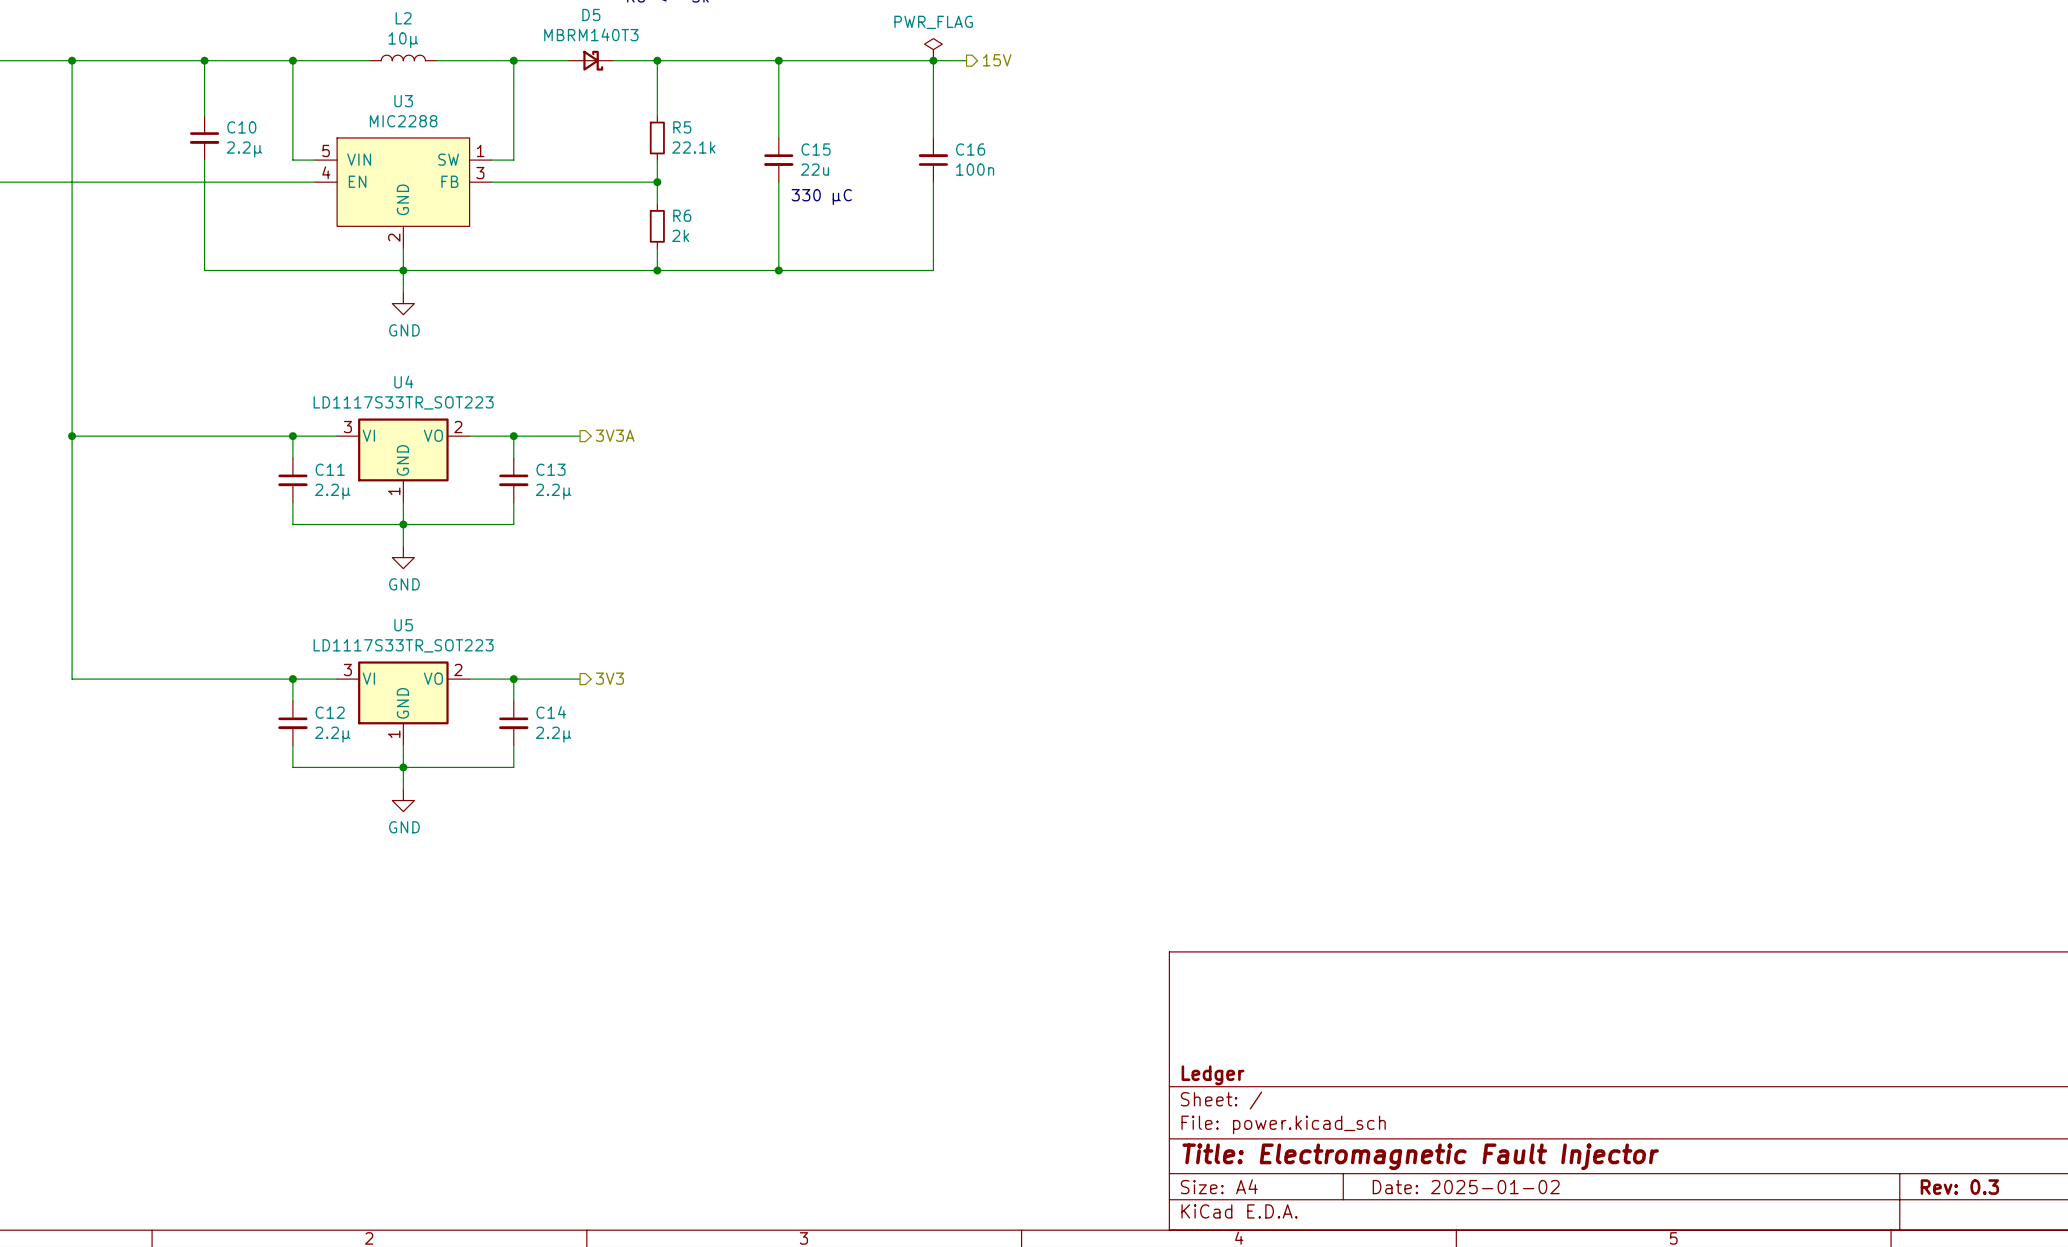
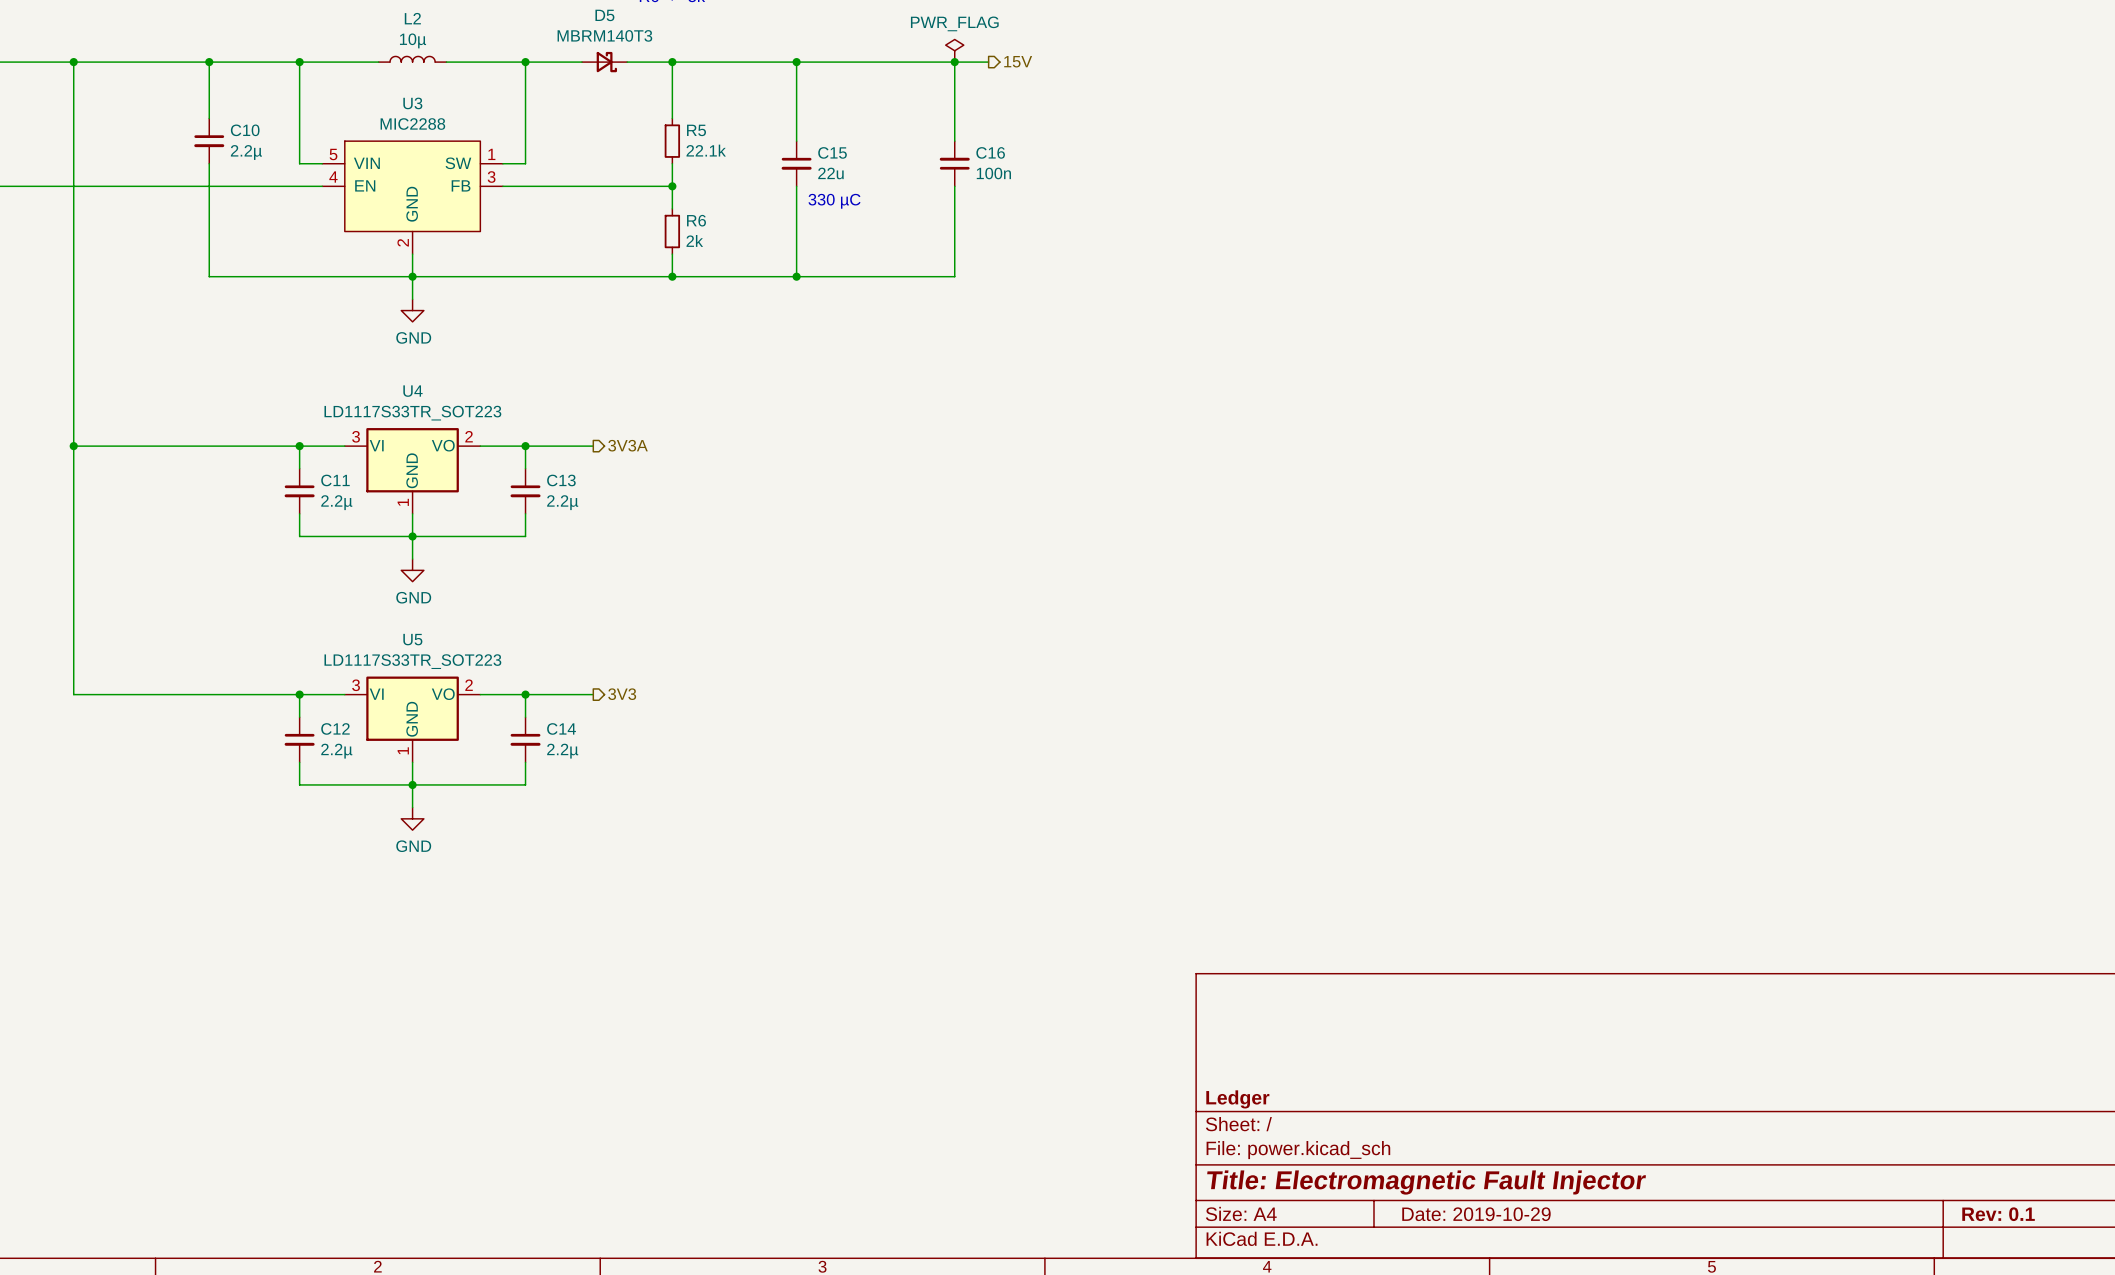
title block: Date: 2025-01-02 (1466, 1187) -> Date: 2019-10-29 (1476, 1214)
title block: Rev: 0.3 (1959, 1187) -> Rev: 0.1 (1998, 1214)

